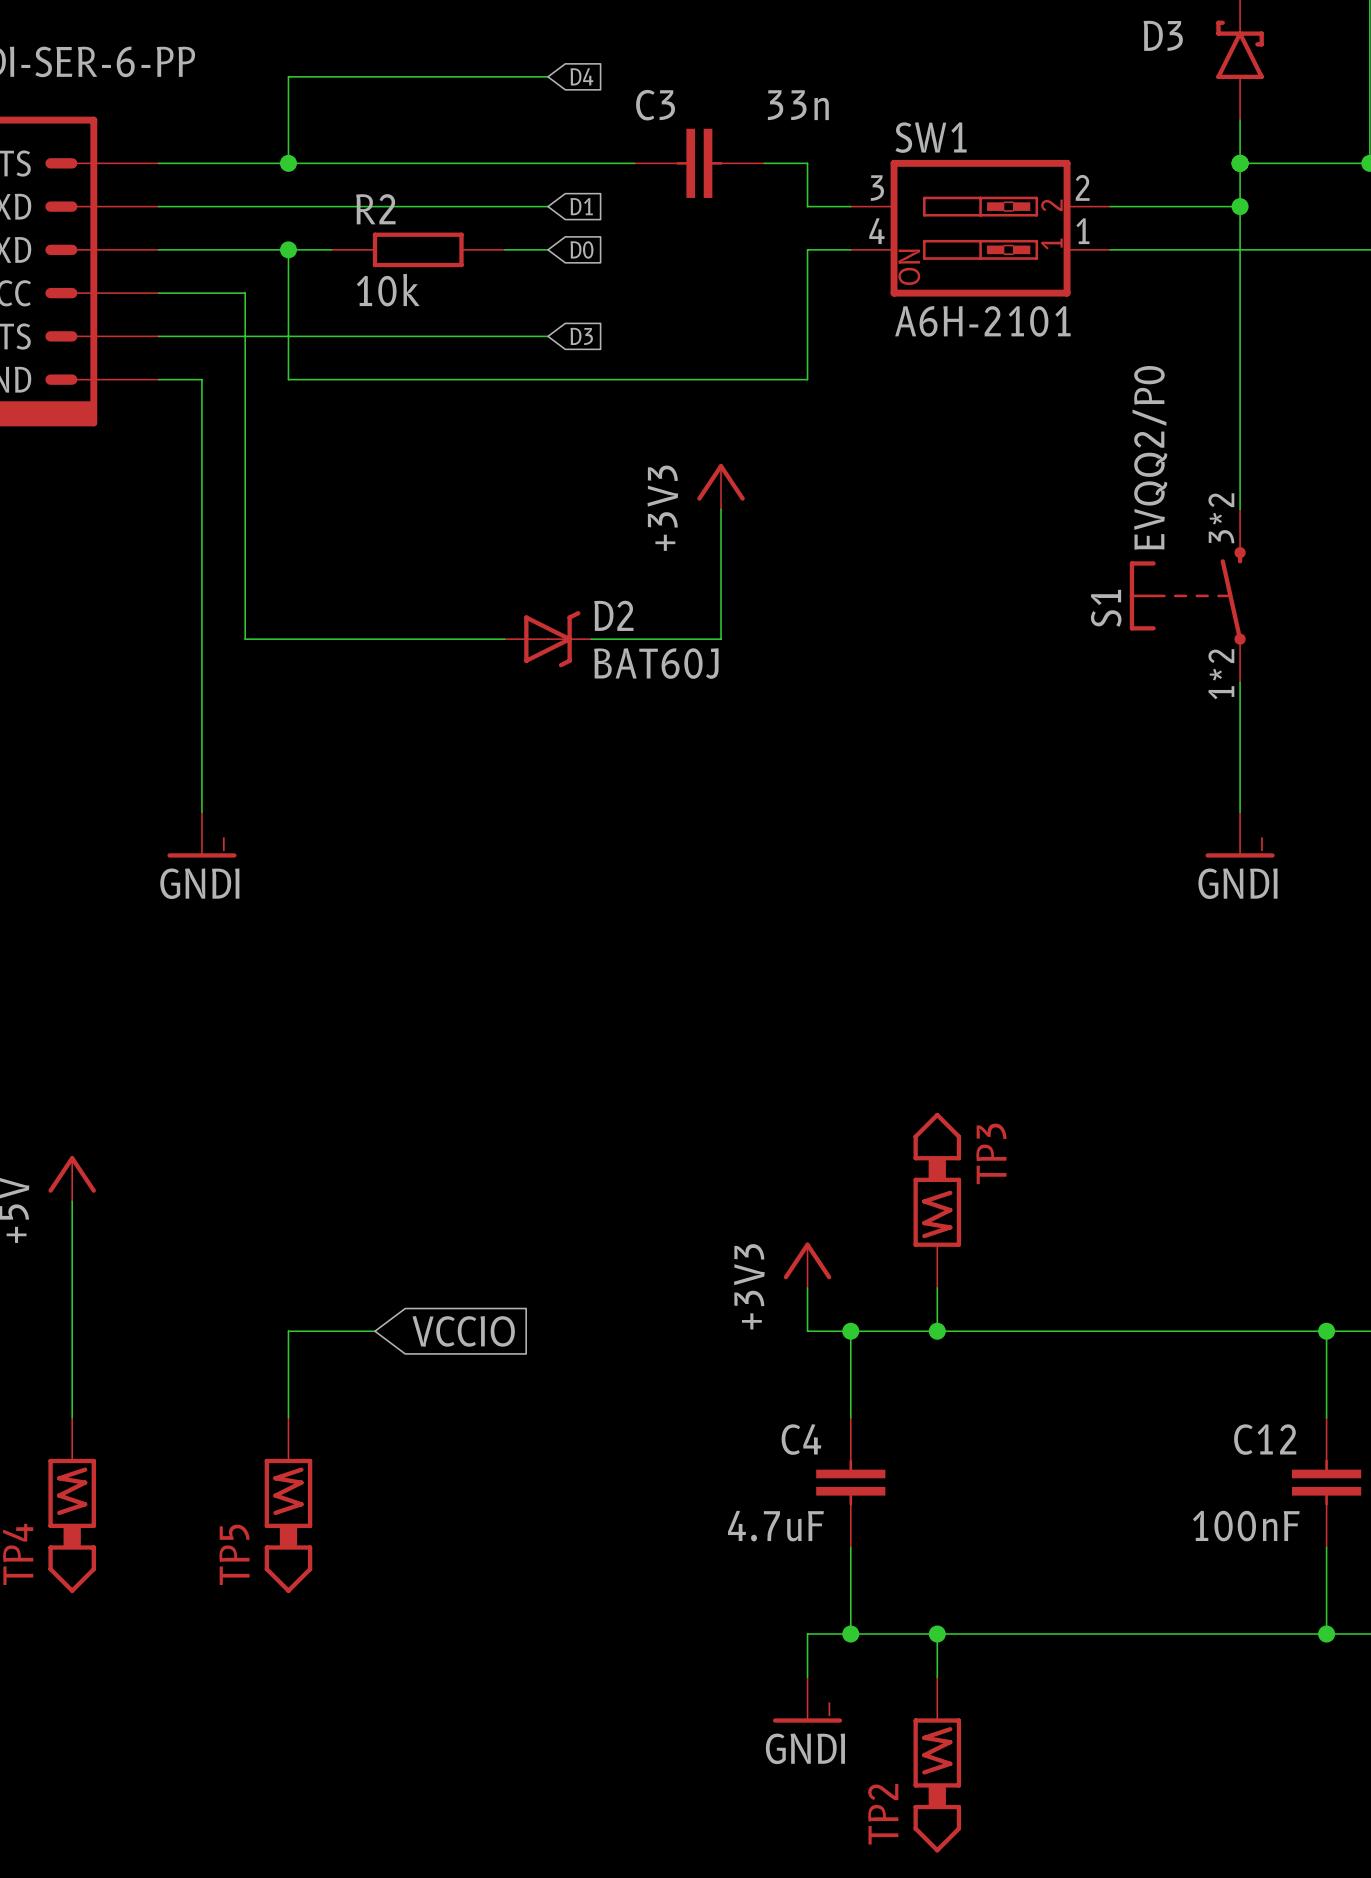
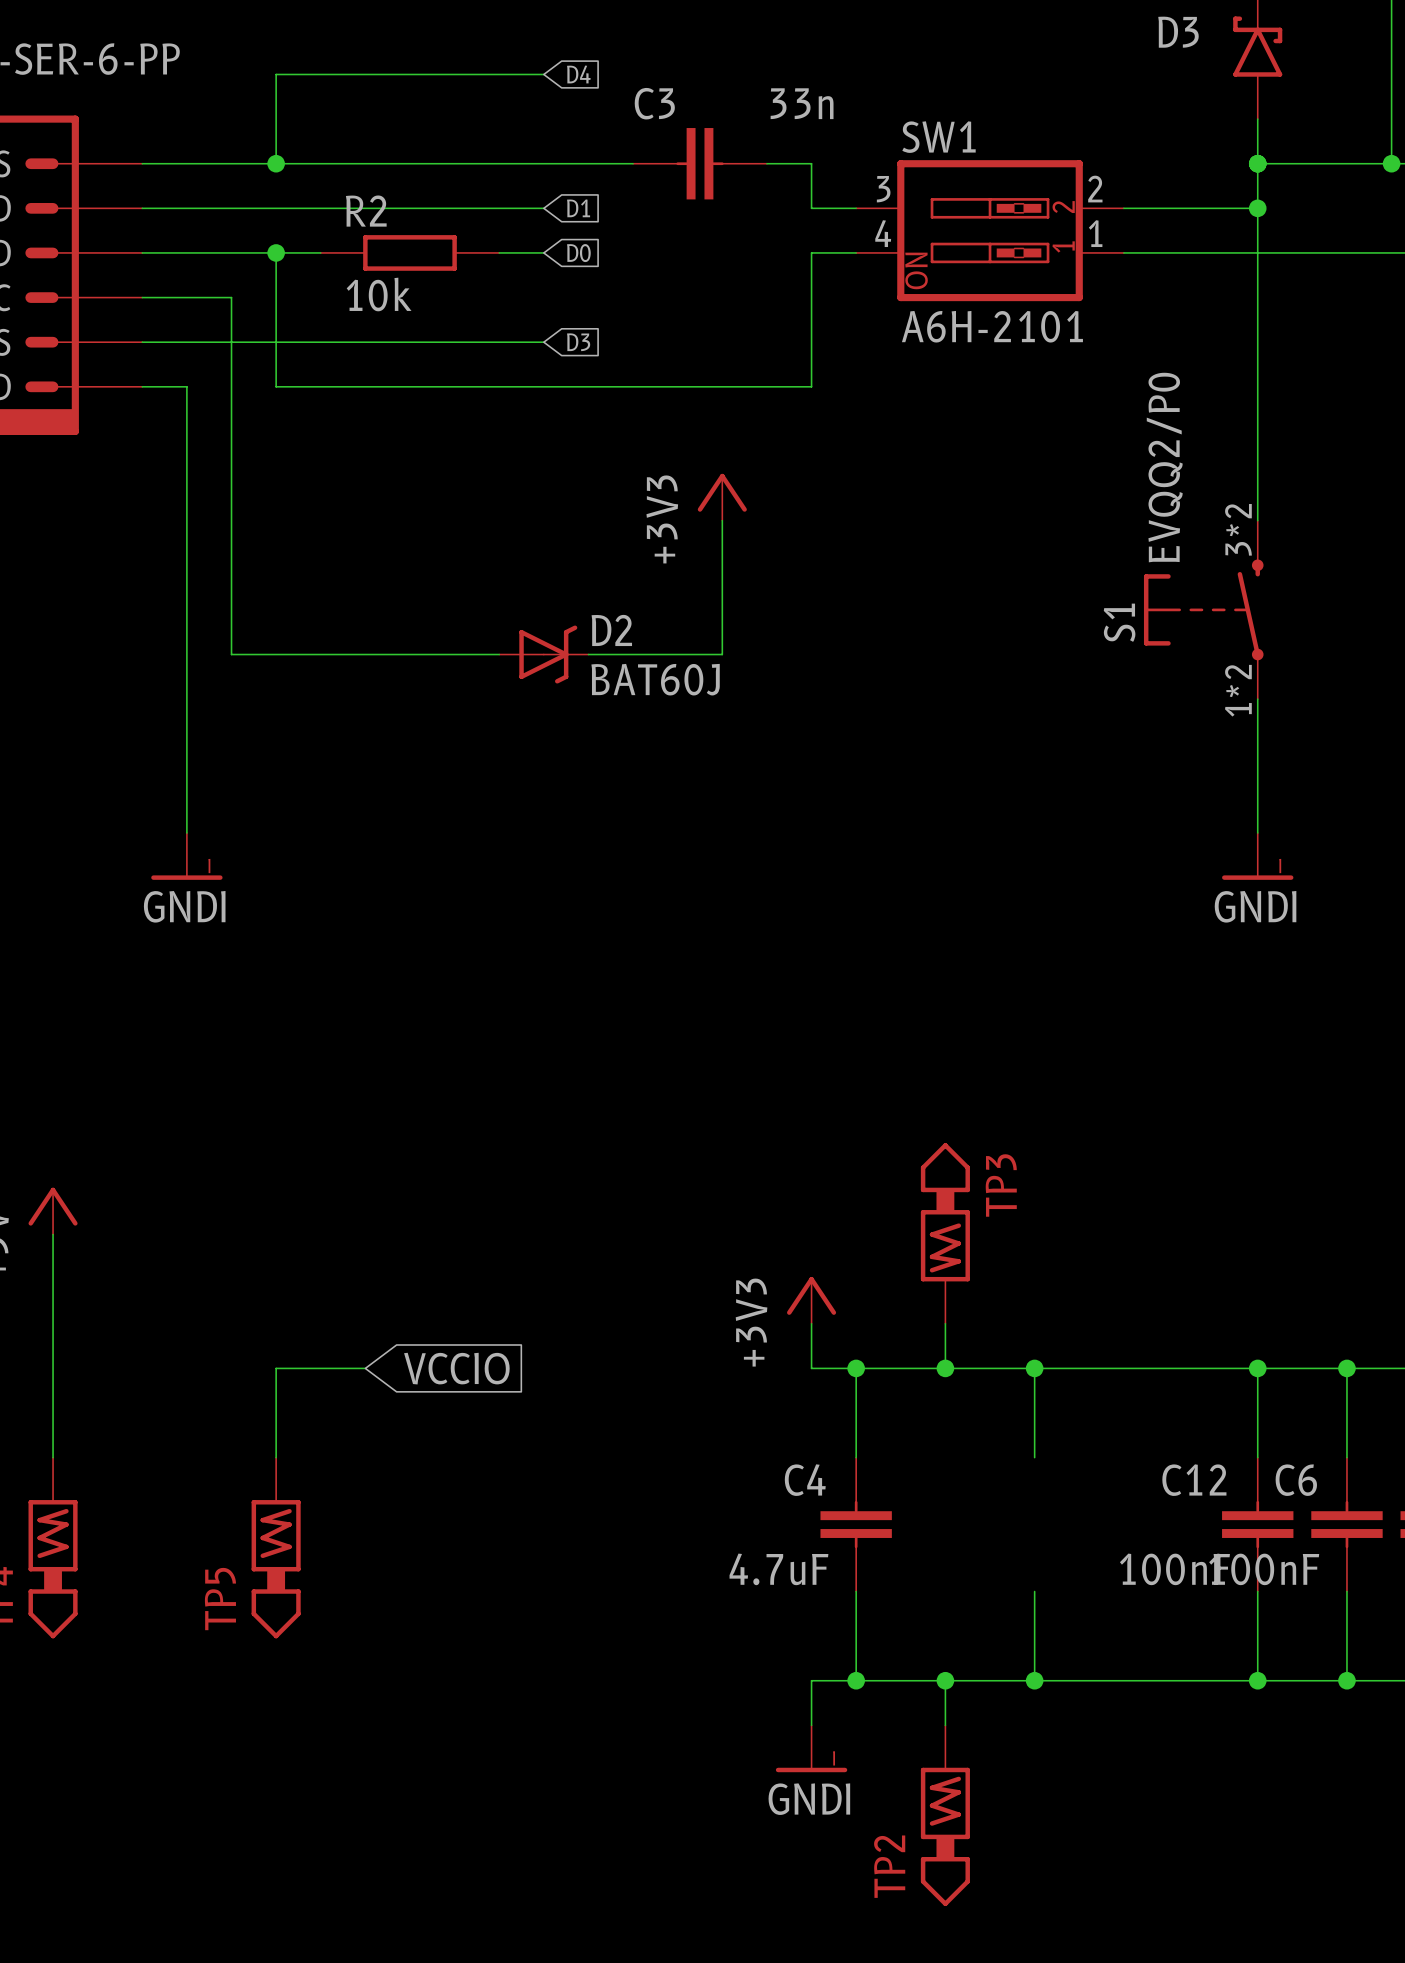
wire: none -> (1034, 1368) (1034, 1457)
junction: none -> (1034, 1368)
wire: none -> (1257, 1368) (1257, 1457)
junction: none -> (1257, 1368)
C12 name: C12 (1265, 1439) -> C6 (1296, 1480)
C12: none -> 100nF (1257, 1524)
wire: none -> (1034, 1591) (1034, 1680)
wire: none -> (1257, 1591) (1257, 1680)
junction: none -> (1034, 1680)
junction: none -> (1257, 1680)

